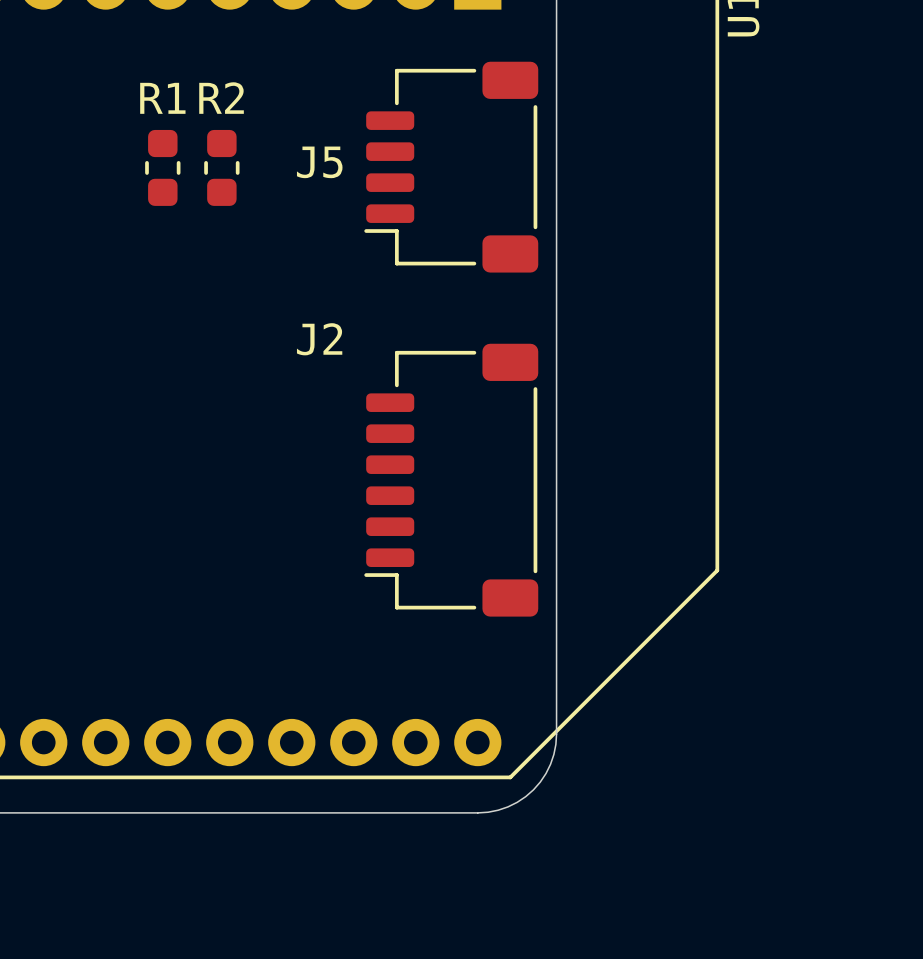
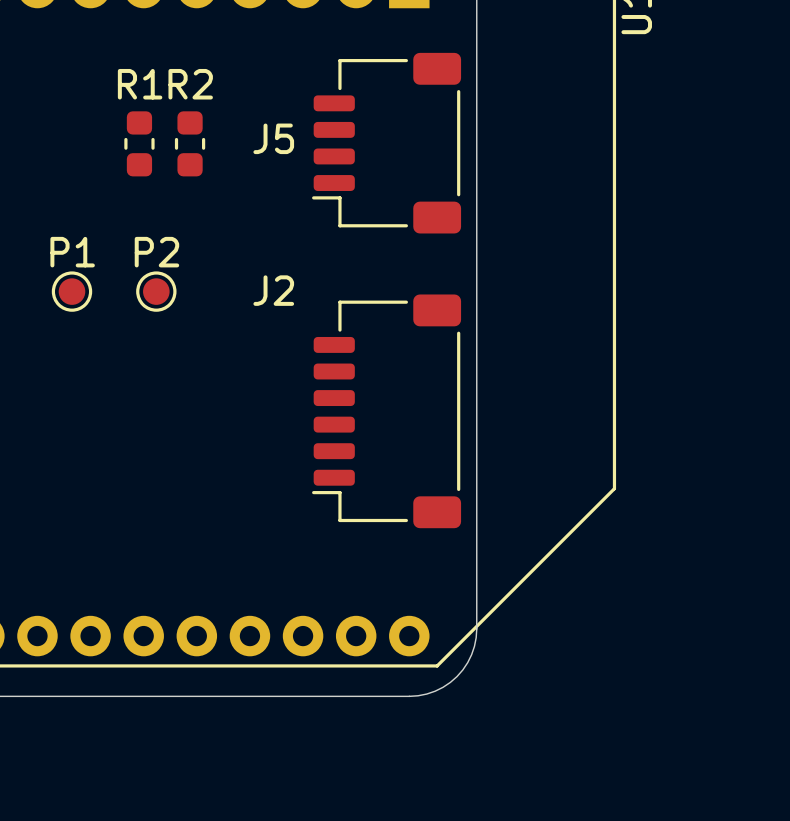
P1: none -> (72, 291)
P2: none -> (156, 291)

